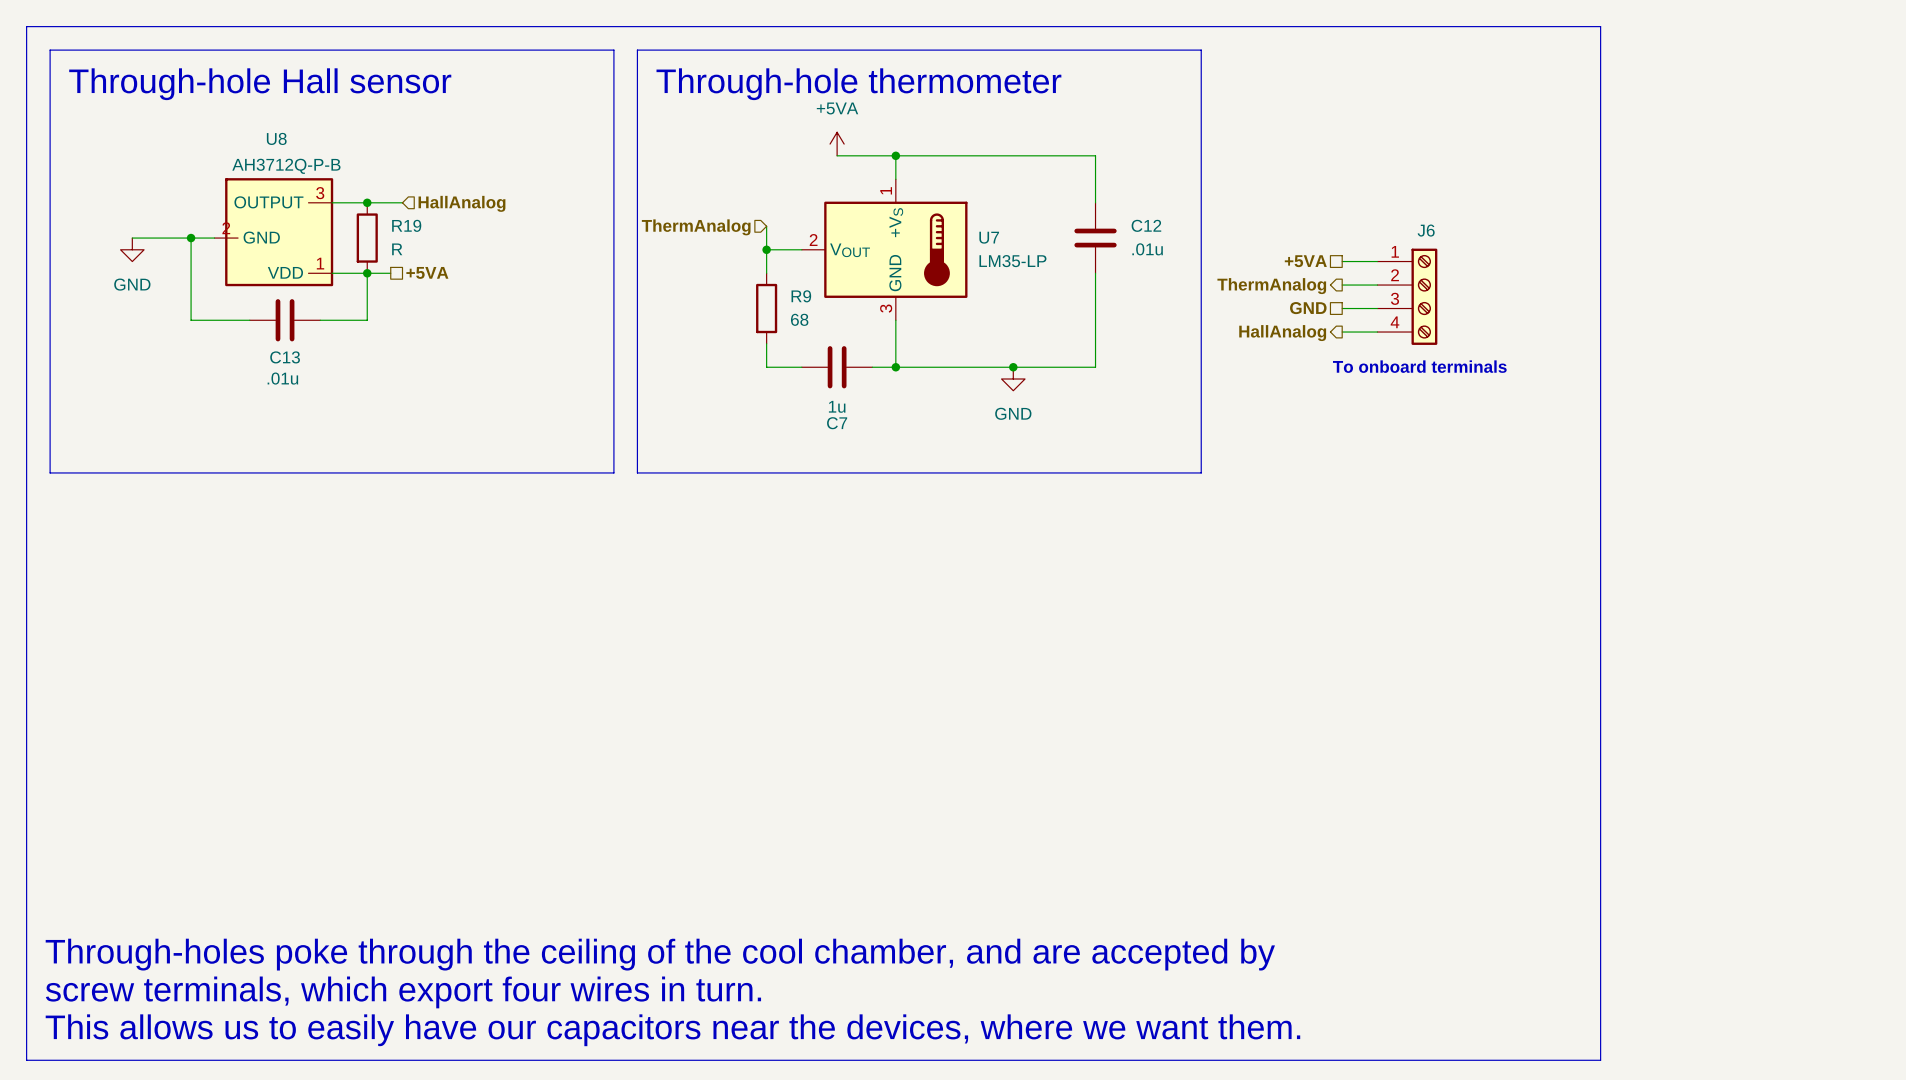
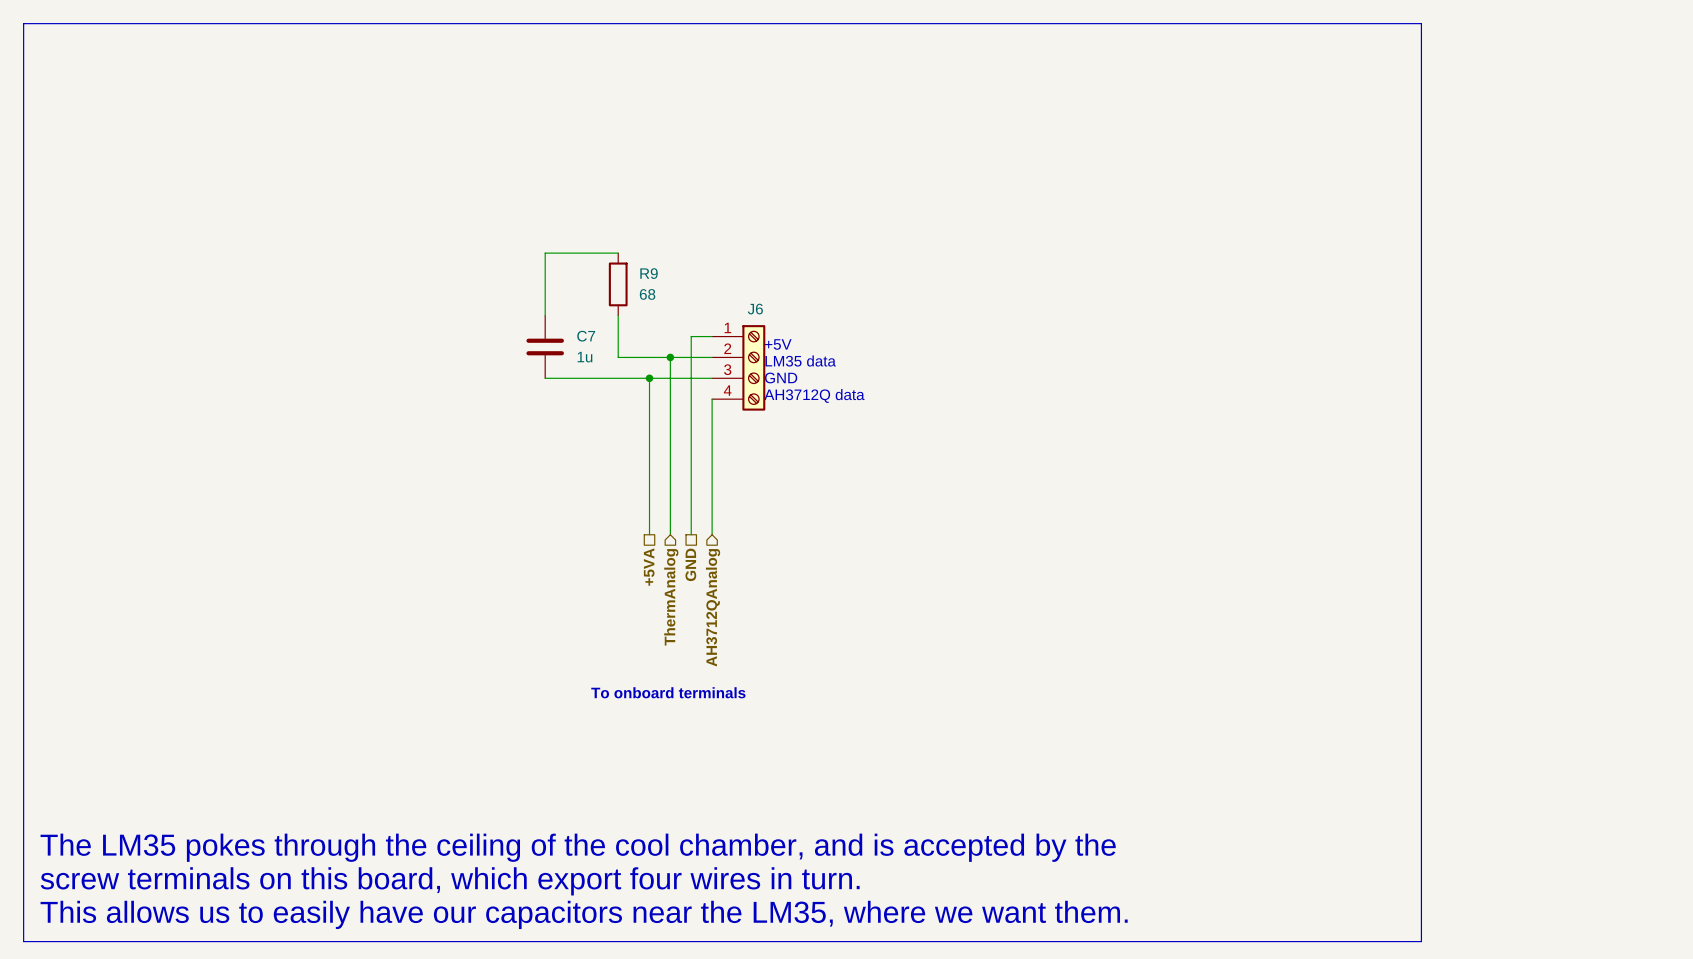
line: (50, 50) (613, 50) (613, 472) (50, 472) (50, 50) -> none
line: (637, 50) (1201, 50) (1201, 472) (637, 472) (637, 50) -> none
text: Through-hole Hall sensor (260, 84) -> none
text: Through-hole thermometer (858, 84) -> none
power symbol: +5VA (837, 144) -> none
wire: (837, 155) (1095, 155) (1095, 202) -> none
wire: (895, 155) (895, 179) -> none
junction: (895, 155) -> none
wire: (332, 202) (402, 202) -> none
junction: (367, 202) -> none
hierarchical label: HallAnalog (461, 203) -> none
wire: (766, 226) (766, 273) -> none
hierarchical label: ThermAnalog (696, 227) -> none
U8: AH3712Q-P-B (273, 232) -> none
wire: (132, 238) (214, 238) -> none
wire: (191, 238) (191, 320) (249, 320) -> none
junction: (191, 238) -> none
R19: R (367, 238) -> none
C12: .01u (1095, 238) -> none
power symbol: GND (132, 249) -> none
wire: (766, 249) (801, 249) -> none
junction: (766, 249) -> none
U7: LM35-LP (884, 249) -> none
hierarchical label: +5VA (1305, 261) -> none
wire: (1342, 261) (1377, 261) -> none
hierarchical label: +5VA (427, 272) -> none
wire: (332, 273) (390, 273) -> none
wire: (367, 273) (367, 320) (320, 320) -> none
junction: (367, 273) -> none
wire: (1095, 273) (1095, 367) (872, 367) -> none
wire: none -> (618, 253) (545, 253) (545, 315)
wire: (1342, 285) (1377, 285) -> none
hierarchical label: ThermAnalog (1271, 286) -> none
J6 position: (1407, 296) -> (738, 367)
R9 position: (766, 308) -> (618, 284)
hierarchical label: GND (1308, 308) -> none
wire: (1342, 308) (1377, 308) -> none
C13: .01u (285, 320) -> none
wire: (895, 320) (895, 367) -> none
wire: (1342, 332) (1377, 332) -> none
hierarchical label: HallAnalog (1282, 333) -> none
wire: (766, 343) (766, 367) (801, 367) -> none
wire: none -> (618, 315) (618, 357) (712, 357)
text: To onboard terminals (1419, 366) -> none
C7 rotation: 0° (837, 367) -> 90° clockwise (545, 347)
C7 position: (837, 367) -> (545, 347)
junction: (895, 367) -> none
junction: (1013, 367) -> none
wire: none -> (712, 336) (691, 336) (691, 534)
power symbol: GND (1013, 379) -> none
text: none -> +5V (778, 344)
wire: none -> (670, 357) (670, 534)
junction: none -> (670, 357)
C7 value position: 1u (837, 406) -> 1u (585, 357)
text: none -> LM35 data (800, 360)
C7 name position: C7 (837, 423) -> C7 (586, 336)
wire: none -> (545, 378) (712, 378)
wire: none -> (649, 378) (649, 534)
junction: none -> (649, 378)
text: none -> GND (781, 377)
text: none -> AH3712Q data (814, 395)
wire: none -> (712, 399) (712, 534)
hierarchical label: none -> GND (690, 564)
hierarchical label: none -> +5VA (649, 567)
hierarchical label: none -> ThermAnalog (671, 597)
hierarchical label: none -> AH3712QAnalog (713, 607)
text: none -> To onboard terminals (668, 692)
text: Through-holes poke through the ceiling of the cool chamber, and are accepted by (660, 954) -> The LM35 pokes through the ceiling of the cool chamber, and is accepted by the (578, 847)
text: screw terminals, which export four wires in turn. (403, 992) -> screw terminals on this board, which export four wires in turn. (450, 881)
text: This allows us to easily have our capacitors near the devices, where we want them. (672, 1030) -> This allows us to easily have our capacitors near the LM35, where we want them. (584, 914)

